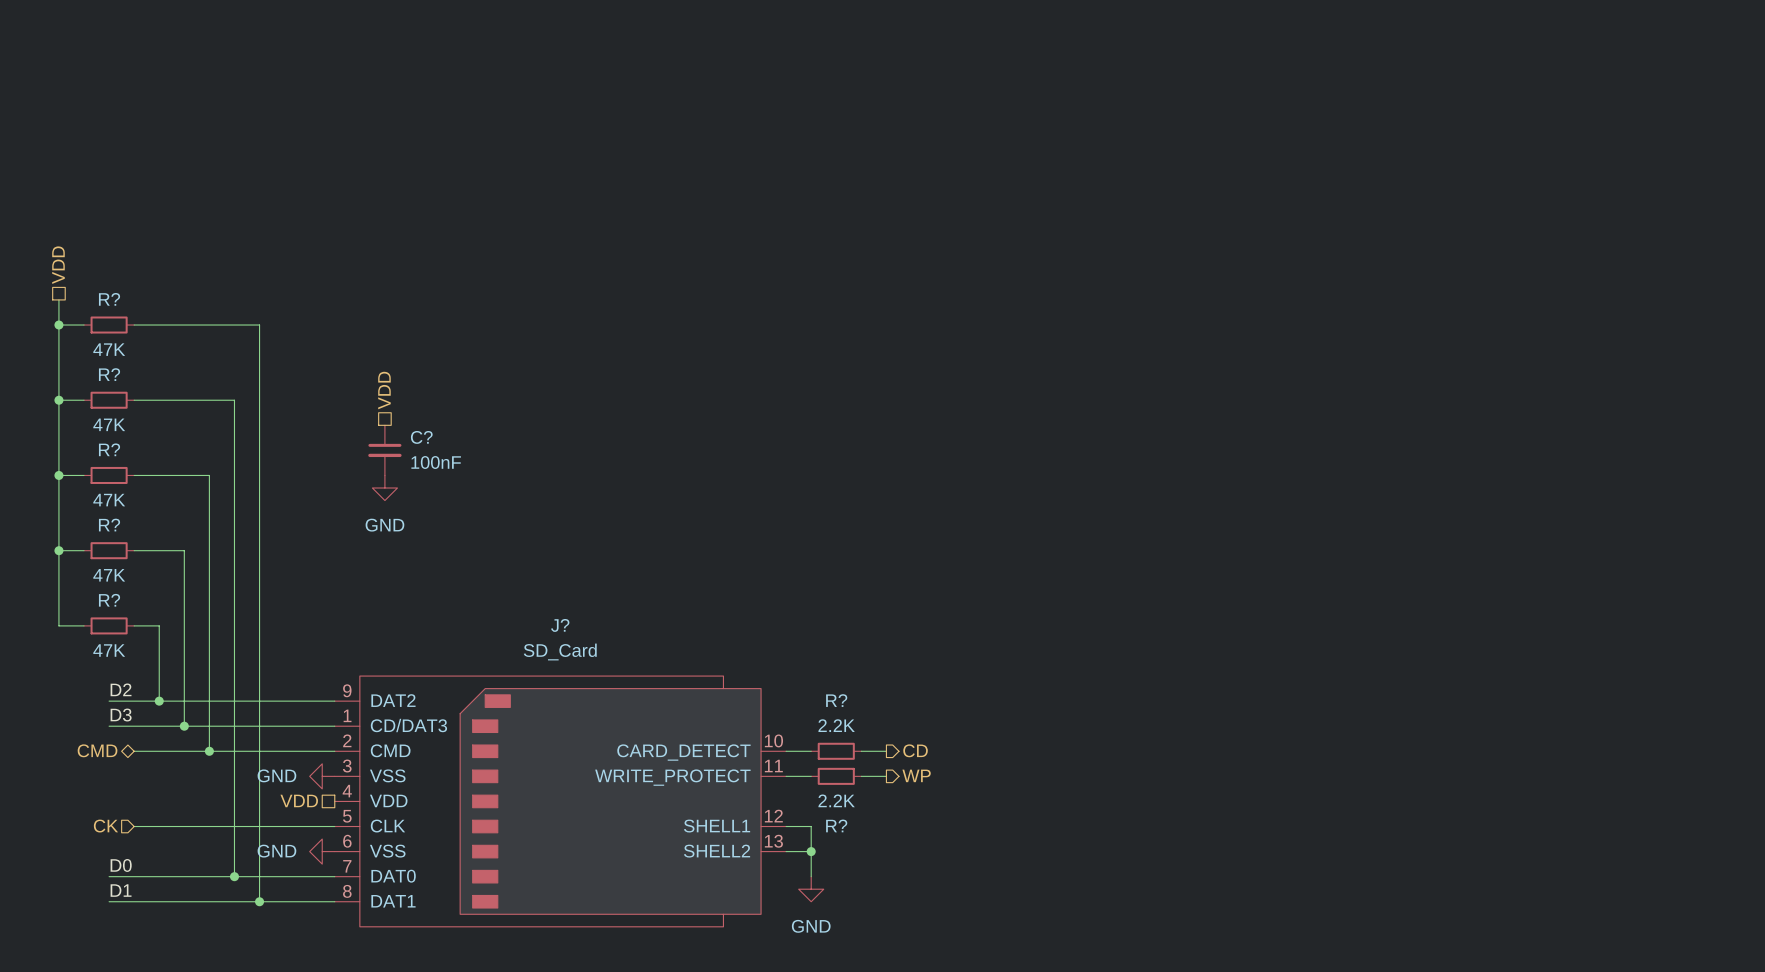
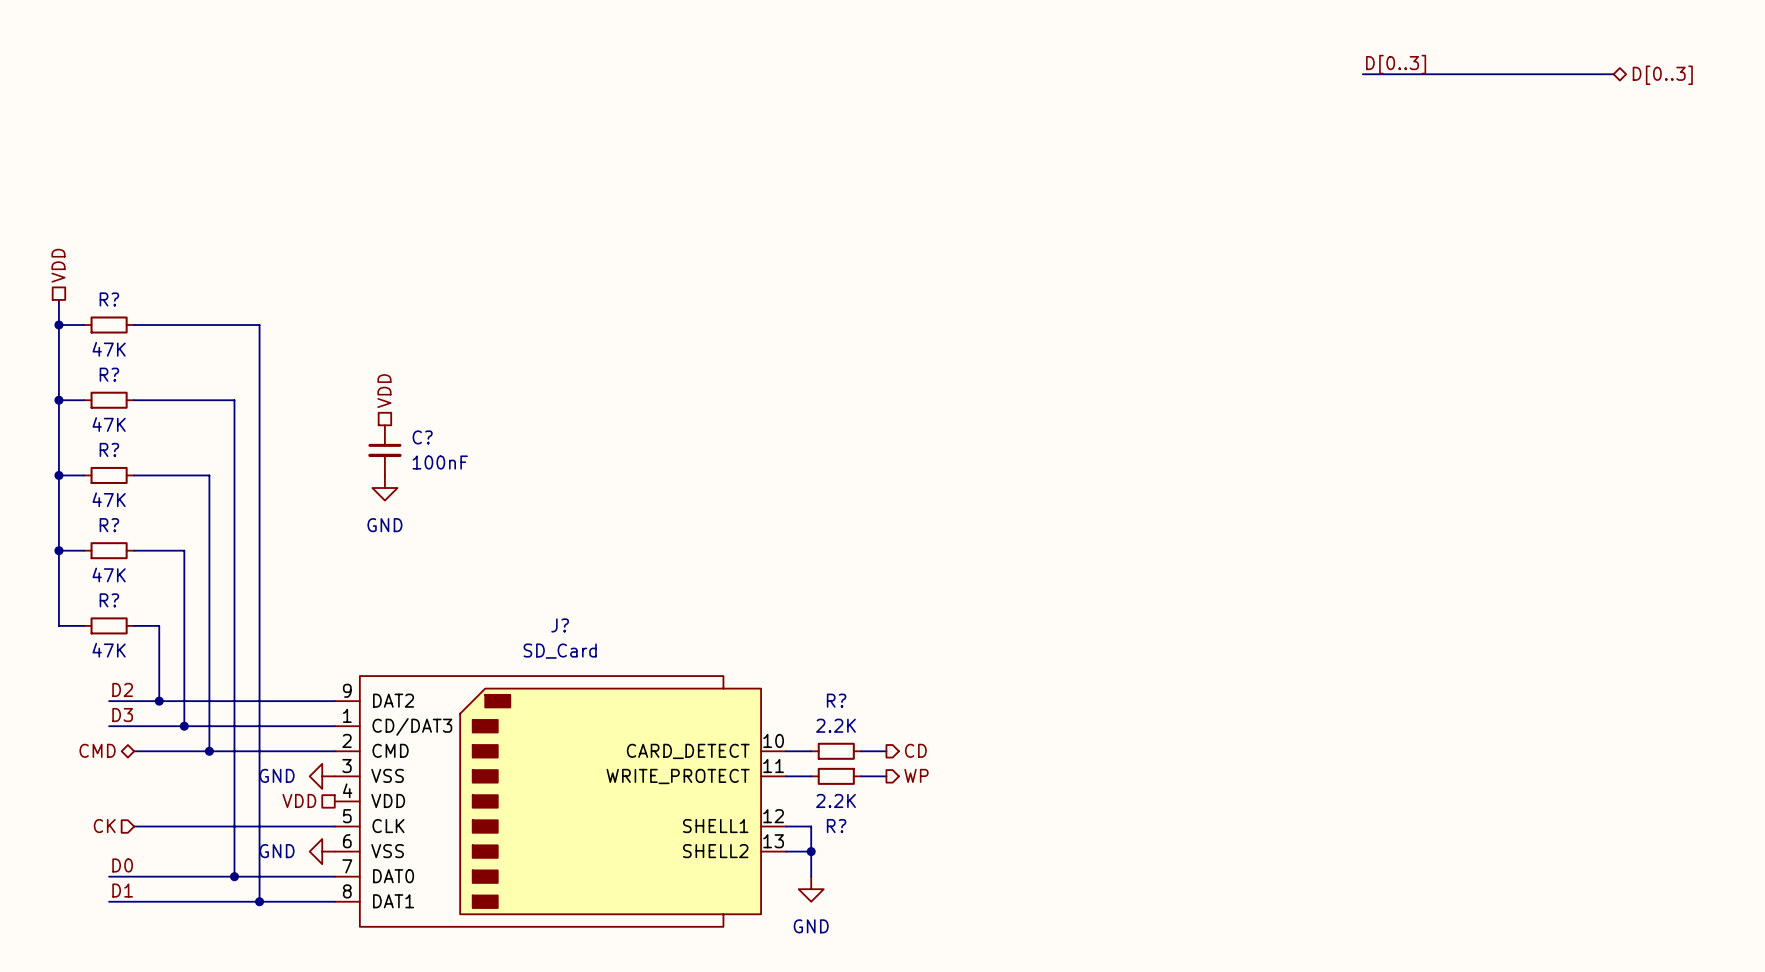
label: none -> D[0..3] (1396, 64)
bus: none -> (1362, 74) (1613, 74)
hierarchical label: none -> D[0..3] (1662, 75)

